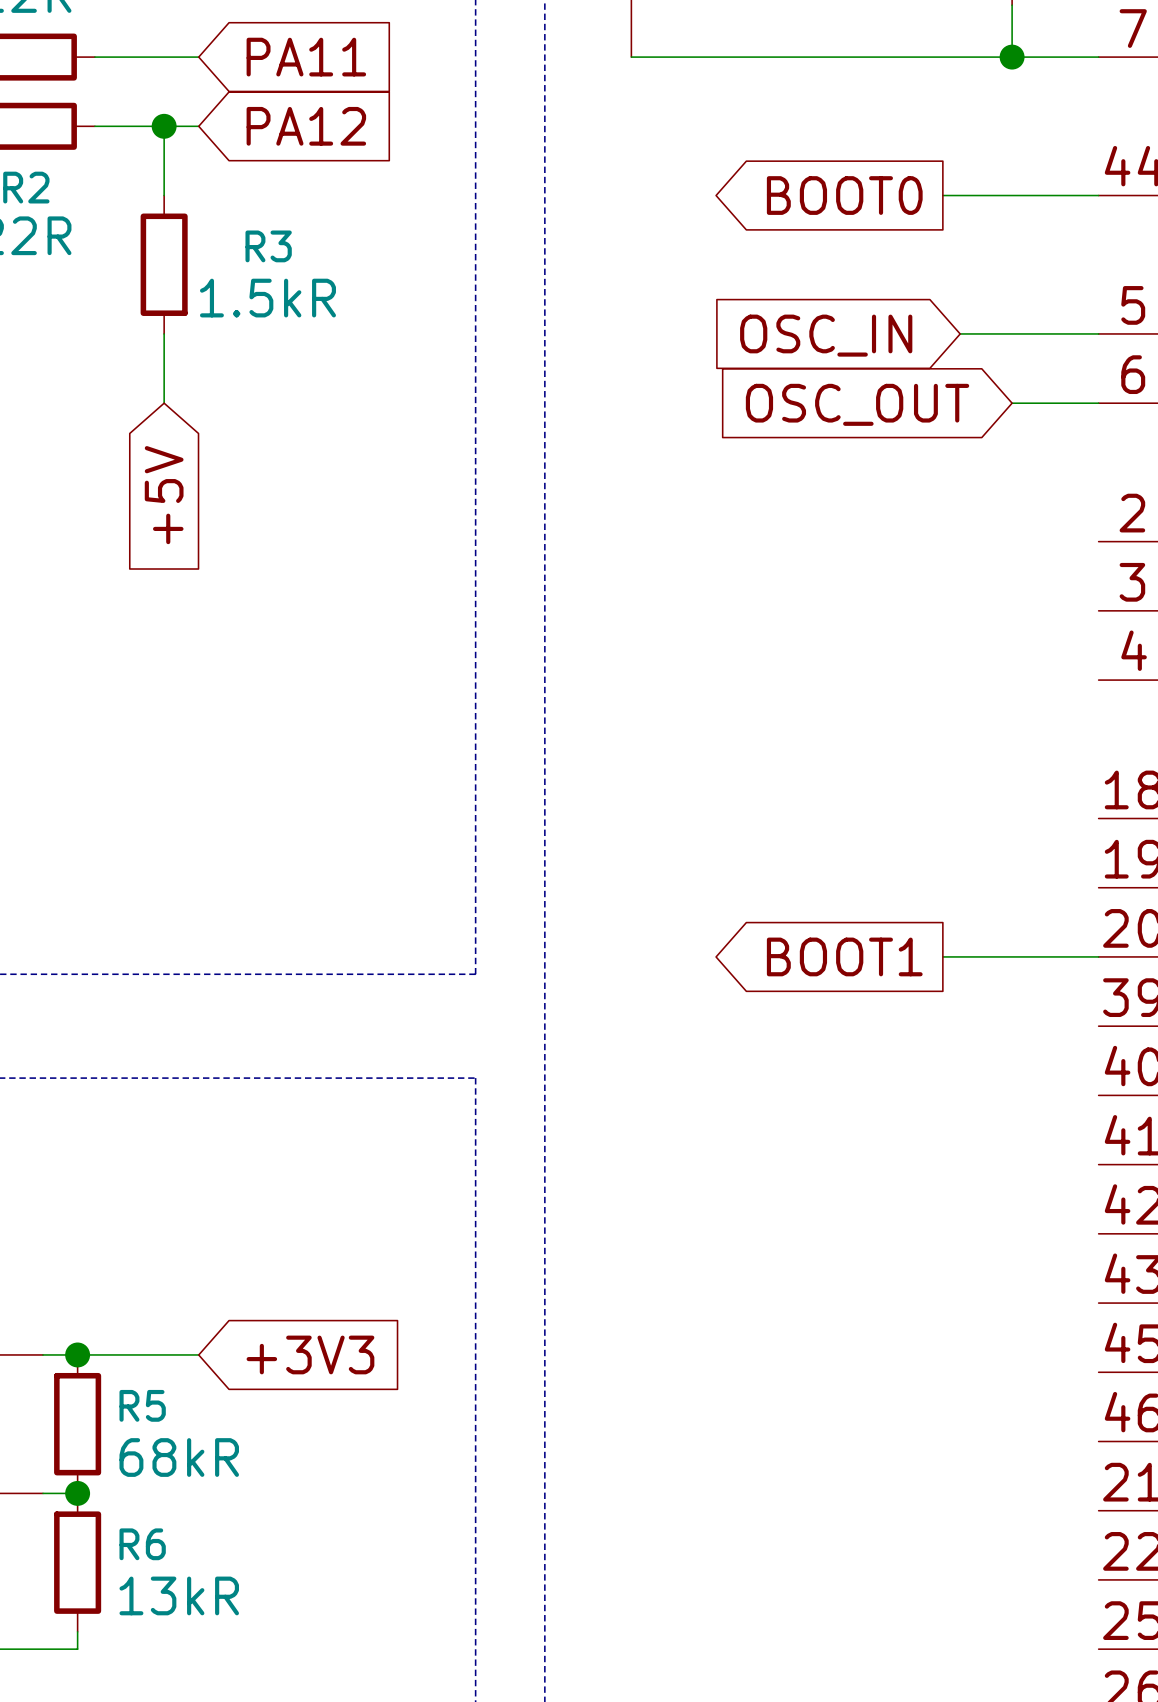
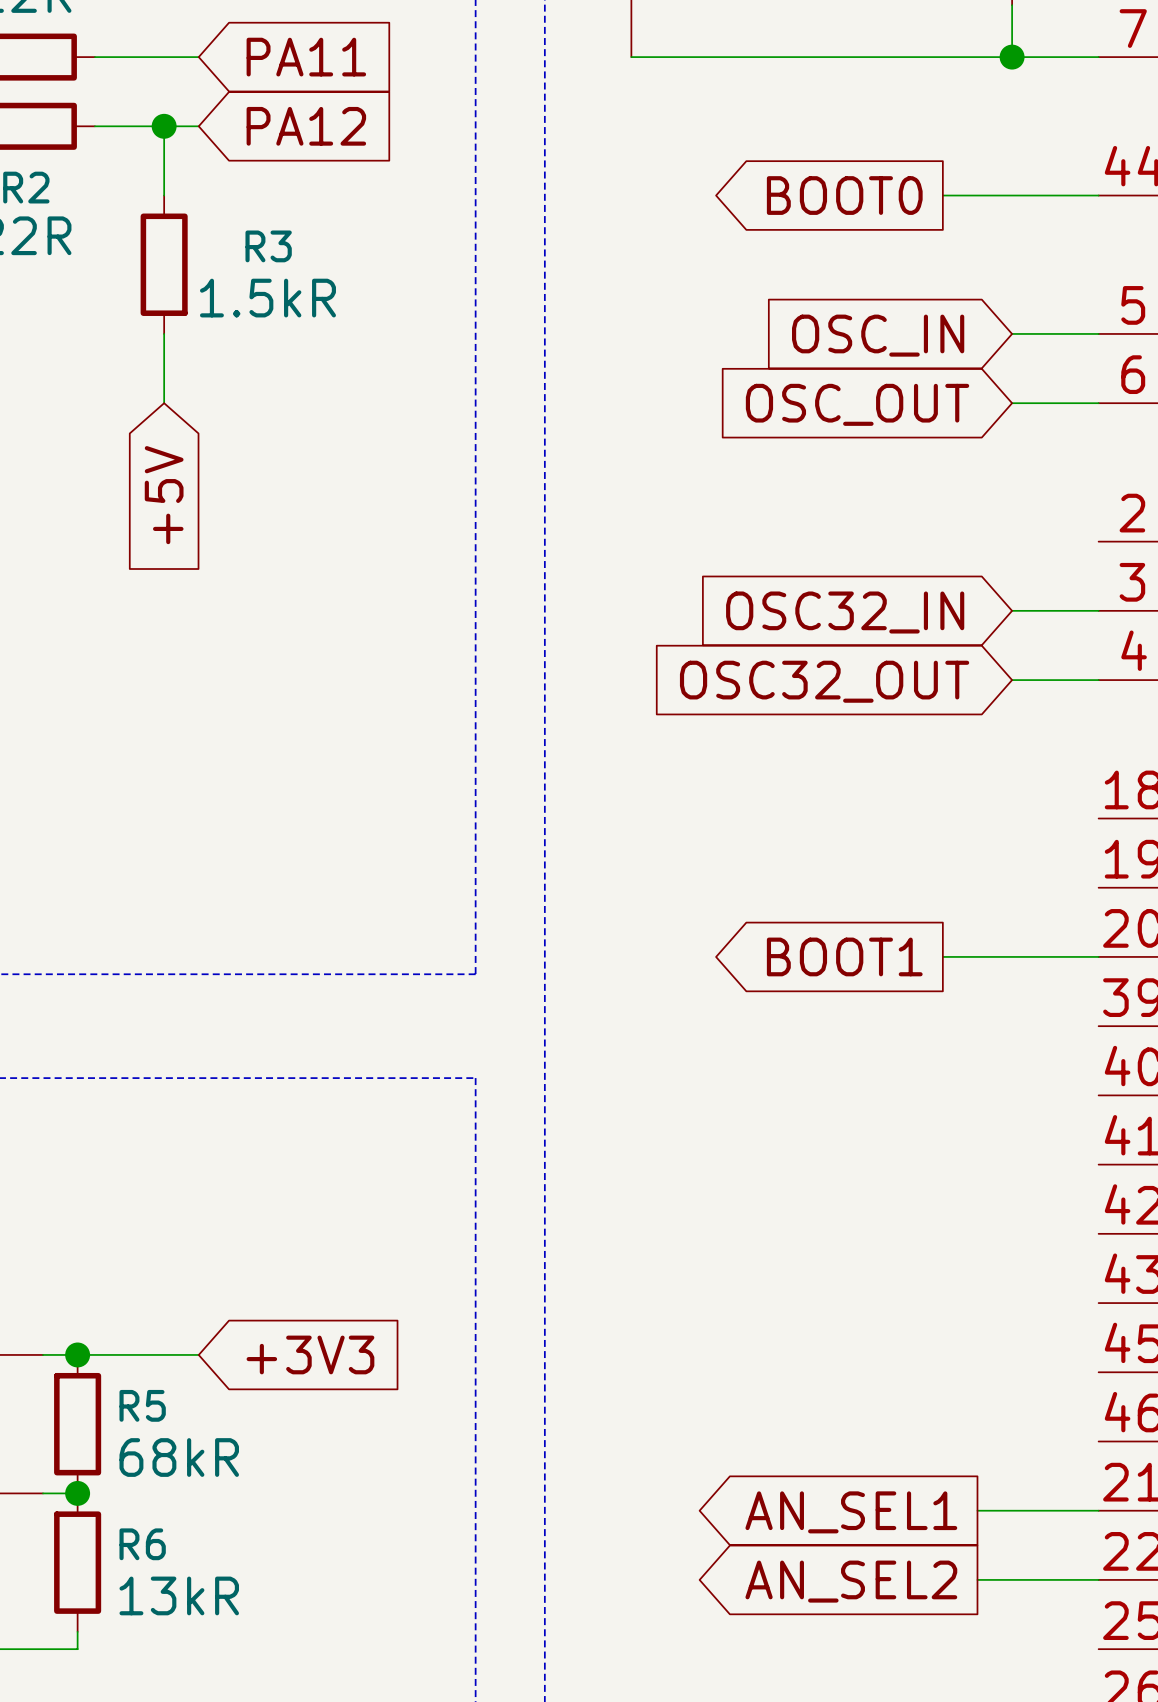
wire: (960, 333) (1012, 333) -> none
global label position: OSC_IN (826, 335) -> OSC_IN (878, 335)
wire: none -> (1012, 610) (1098, 610)
global label: none -> OSC32_IN (845, 612)
wire: none -> (1012, 680) (1098, 680)
global label: none -> OSC32_OUT (824, 681)
wire: none -> (977, 1510) (1098, 1510)
global label: none -> AN_SEL1 (851, 1512)
wire: none -> (977, 1579) (1098, 1579)
global label: none -> AN_SEL2 (851, 1581)

